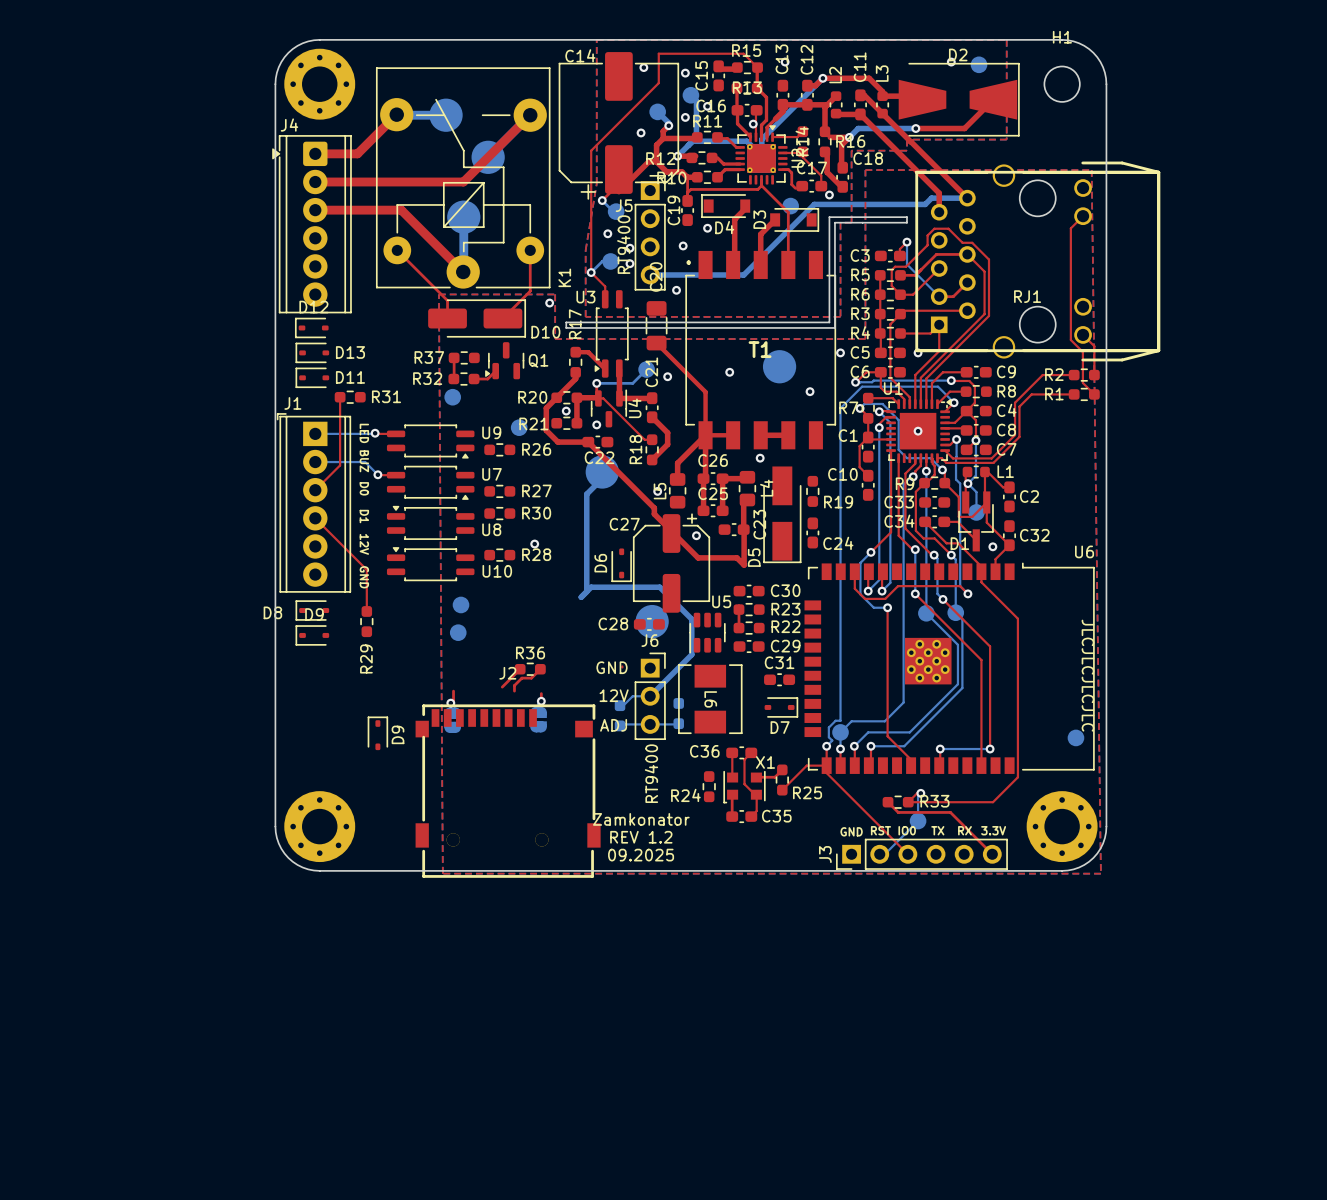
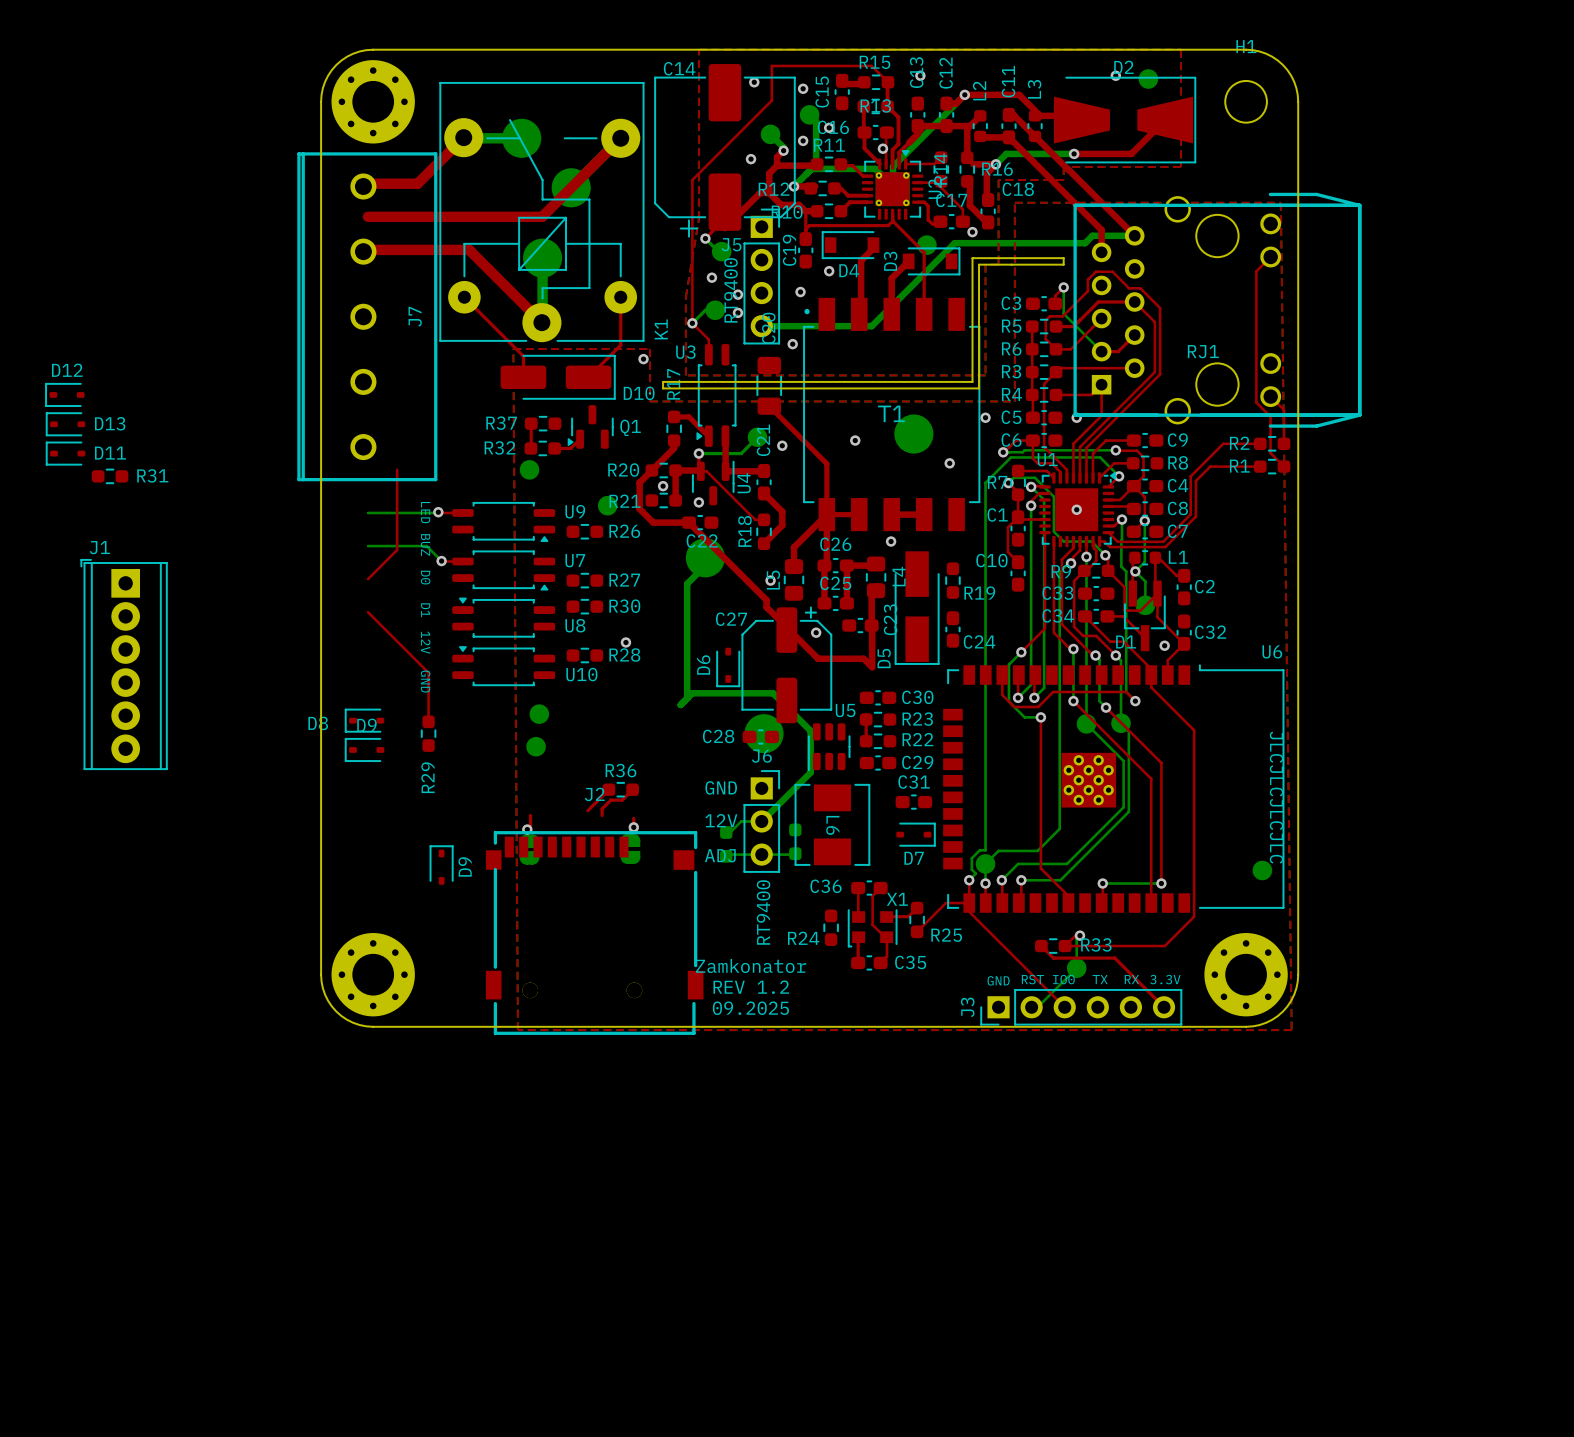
J4: (311, 224) -> none
J7: none -> (367, 316)
D12 position: (311, 327) -> (64, 394)
D13 position: (312, 352) -> (65, 424)
D11 position: (312, 377) -> (65, 453)
R31 position: (350, 397) -> (110, 476)
J1 position: (313, 502) -> (124, 664)

